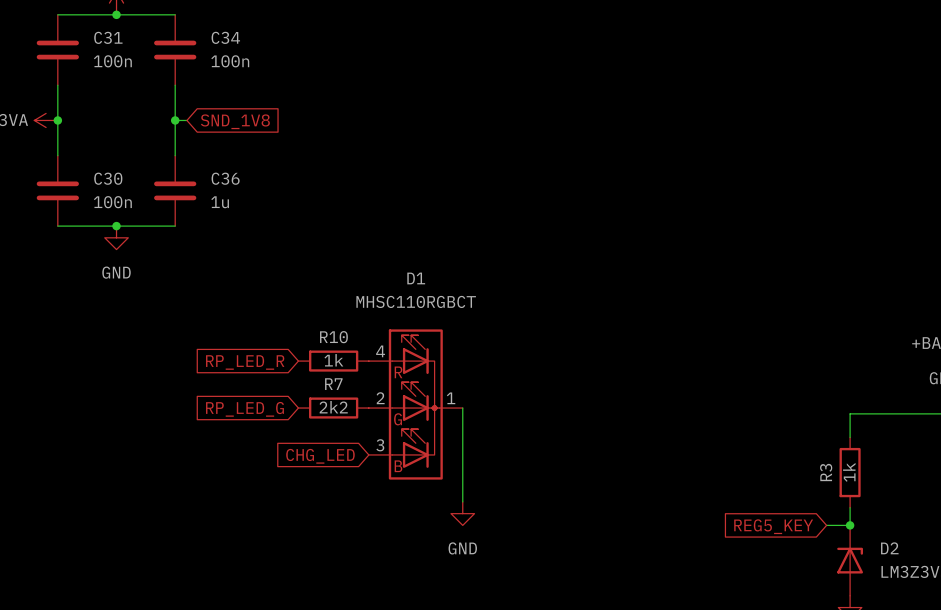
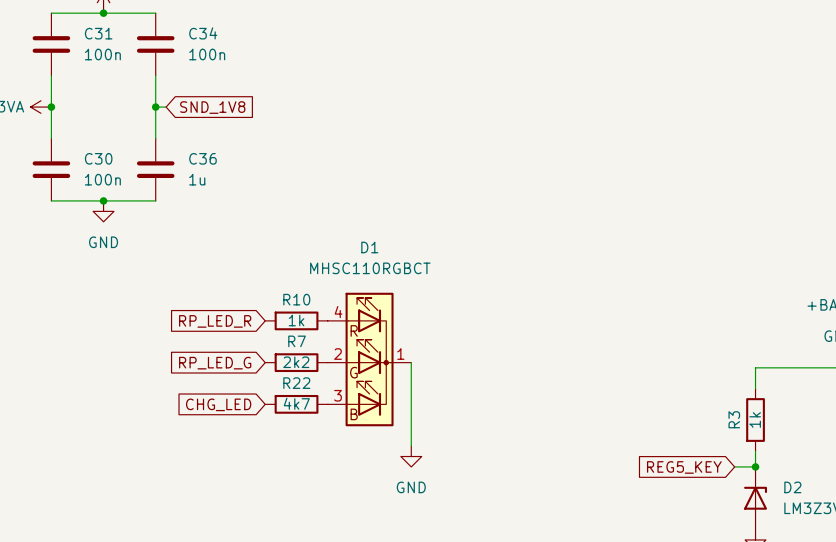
R22: none -> 4k7 (296, 404)
global label position: CHG_LED (320, 456) -> CHG_LED (218, 404)

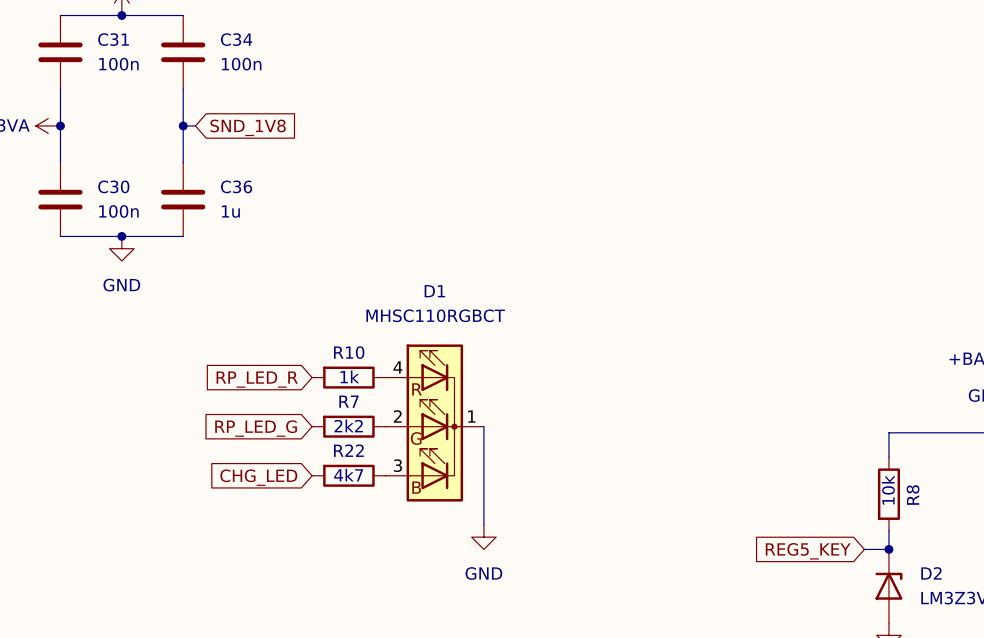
R3 name: R3 (734, 419) -> R8 (913, 495)
R3 value: 1k (755, 420) -> 10k (888, 489)

